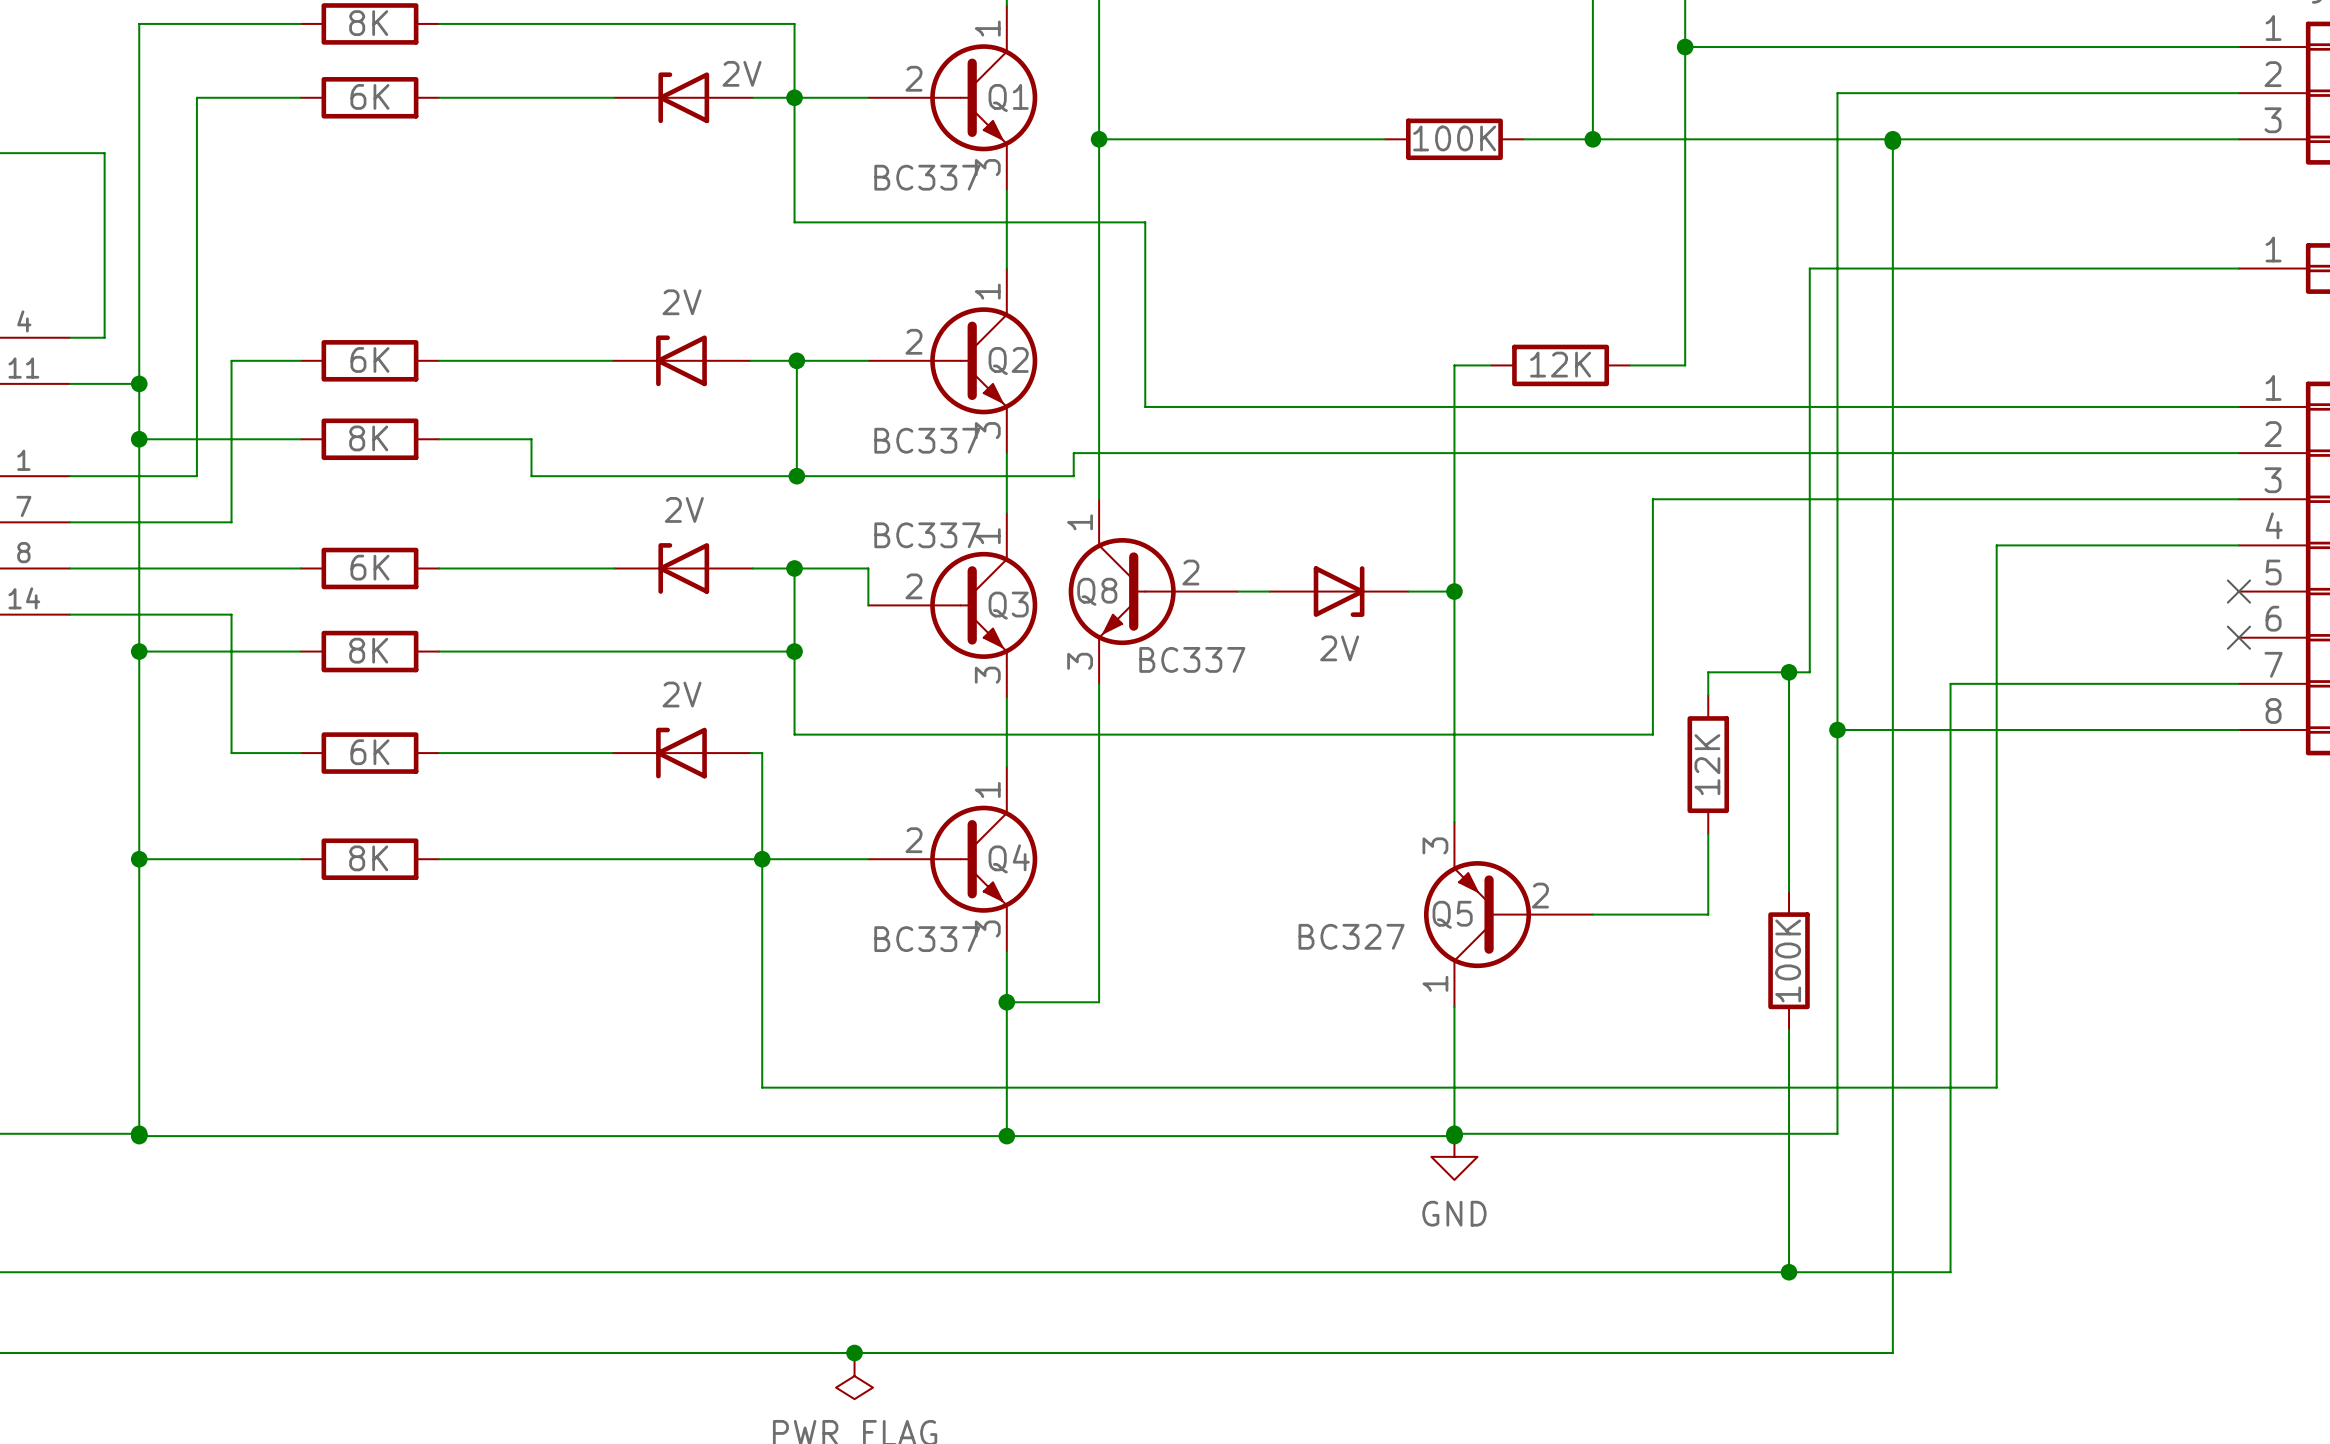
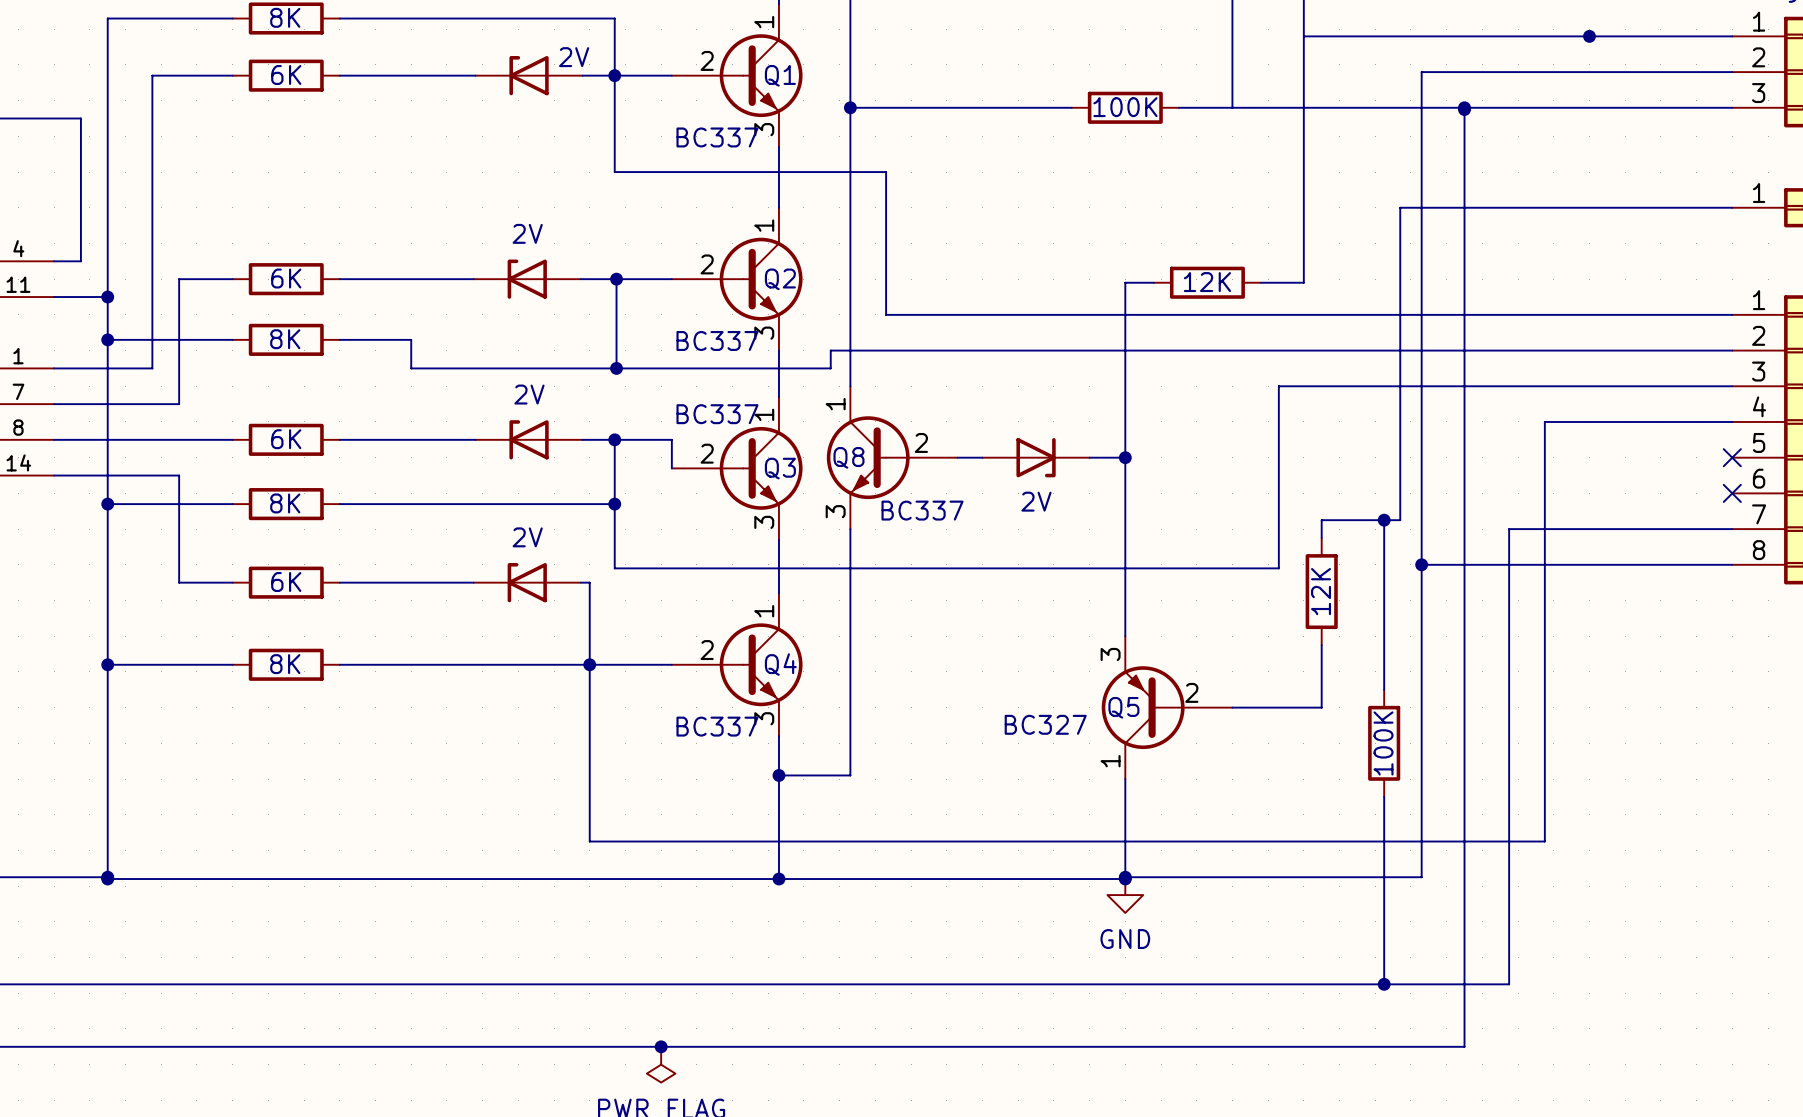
junction: (1685, 47) -> none
junction: none -> (1589, 36)
junction: (1592, 139) -> none

